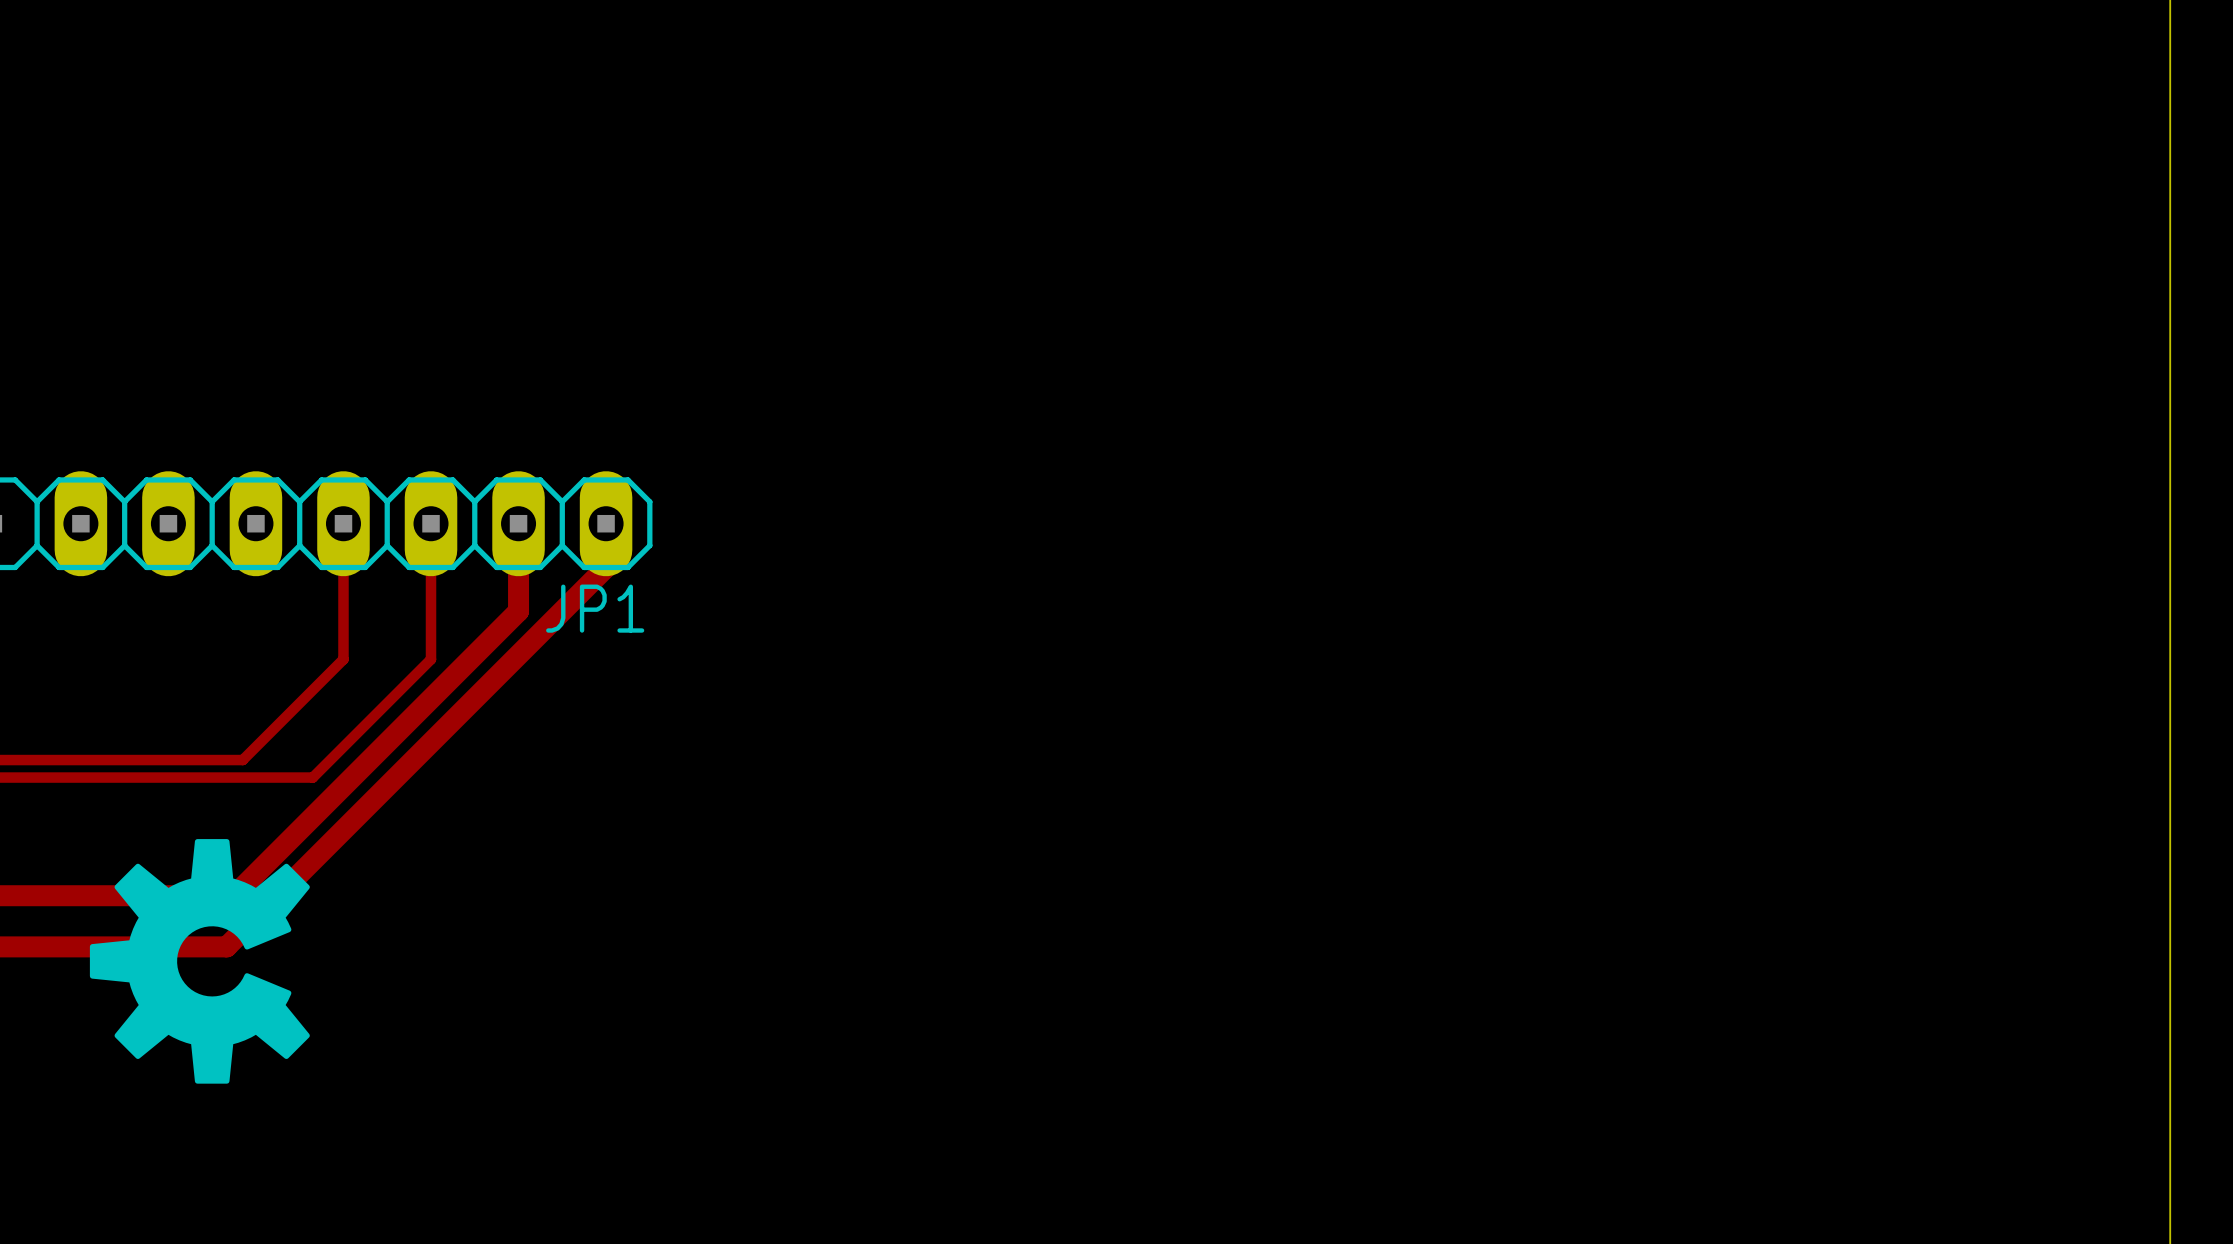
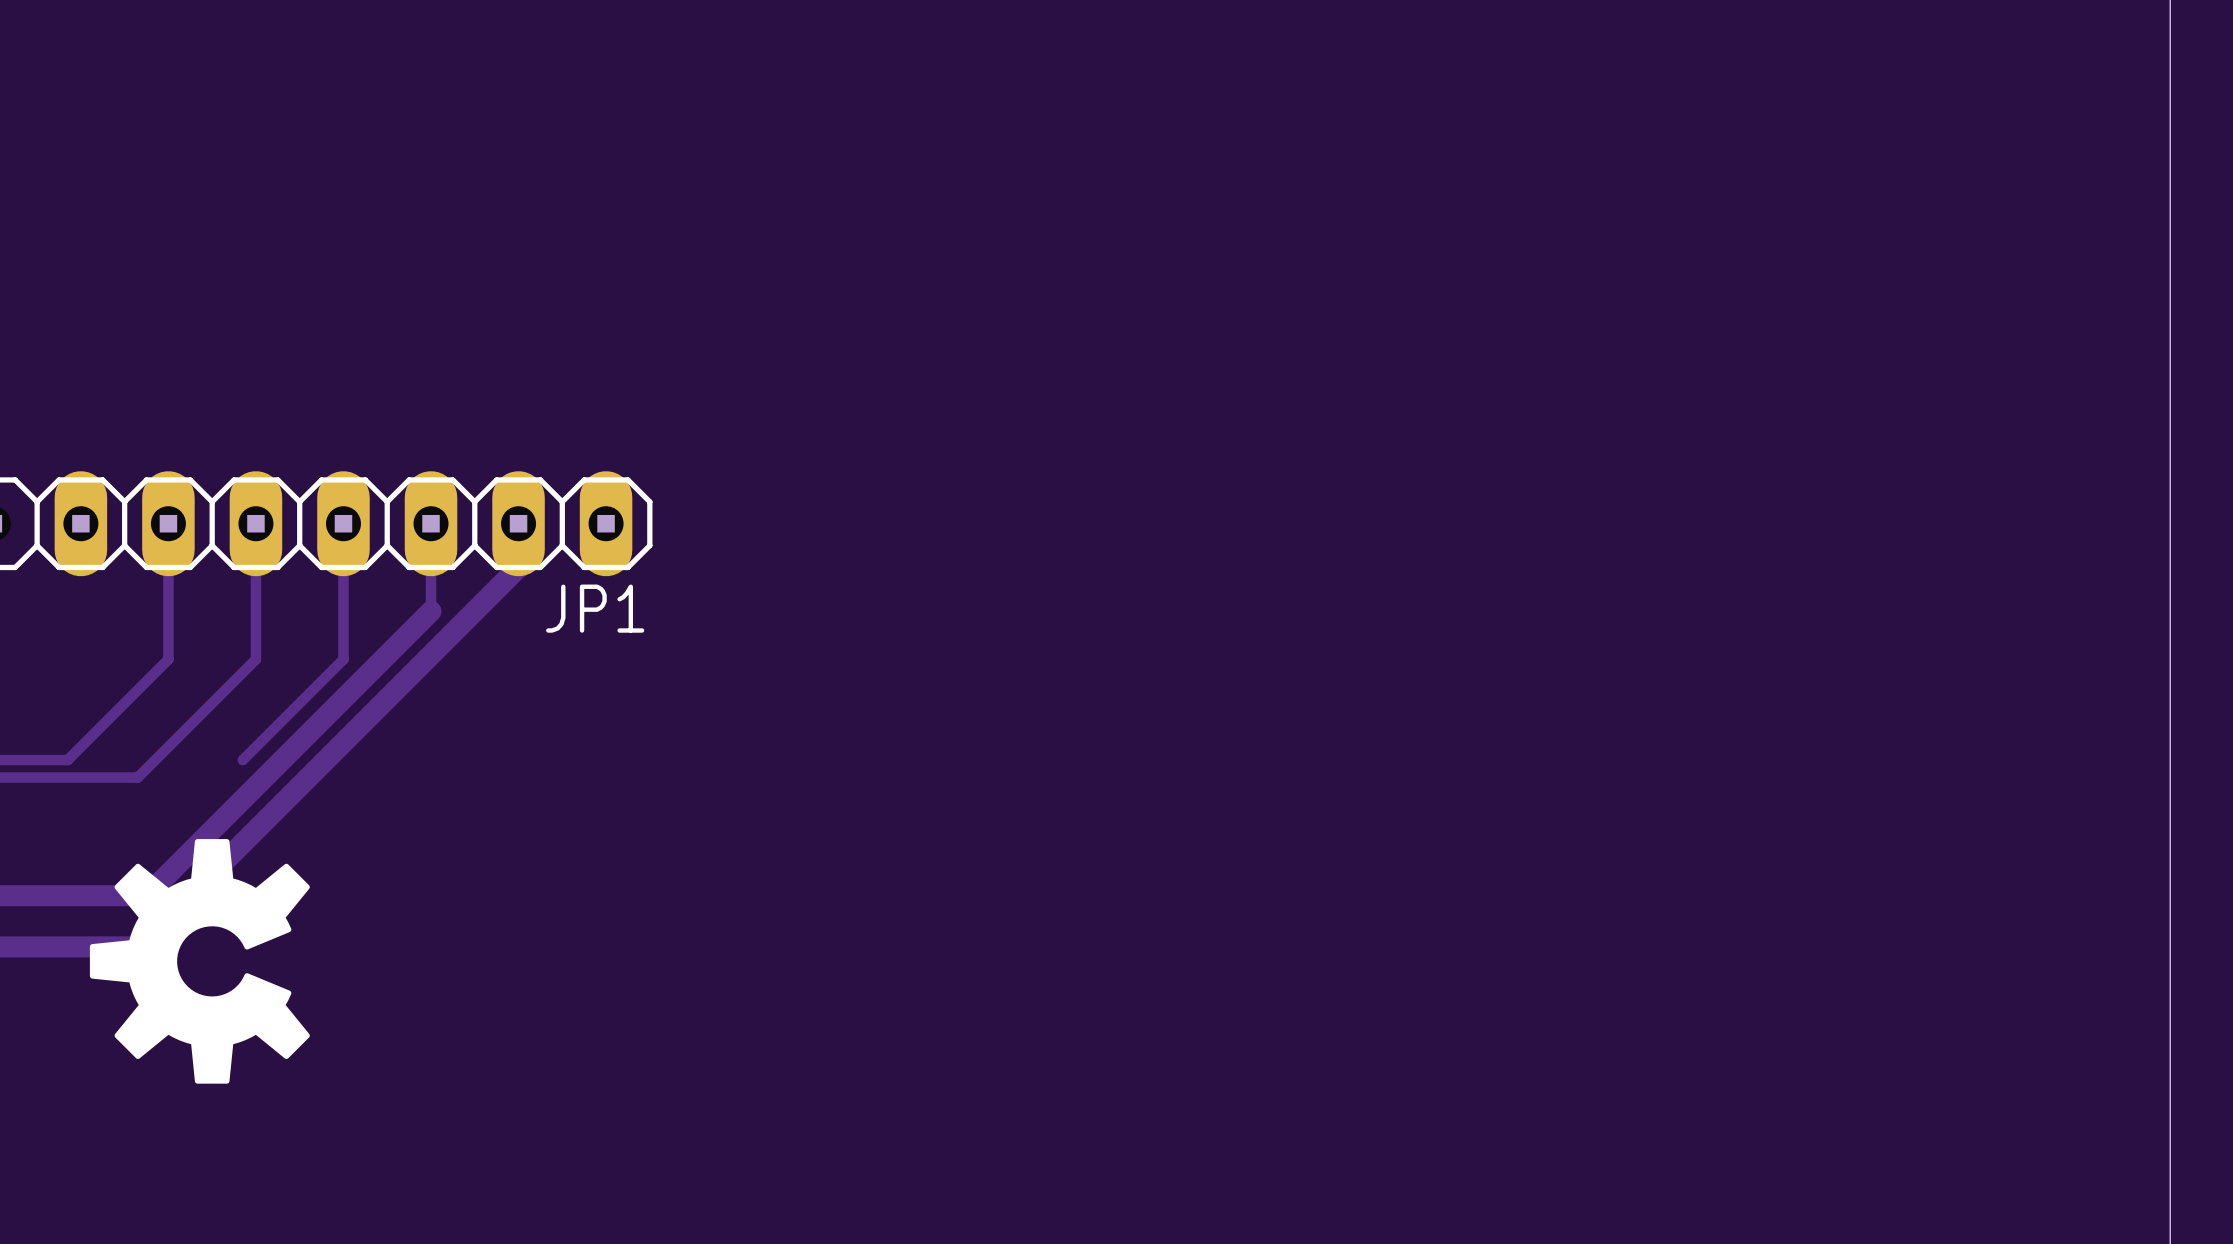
track: none -> (255, 523) (255, 659) (137, 777)
track: (606, 523) (606, 567) (226, 946) (139, 946) -> none
track: (518, 567) (518, 611) (234, 895) (146, 895) -> (518, 567) (139, 946)
track: (431, 611) (431, 659) (312, 777) (137, 777) -> (431, 611) (146, 895)
track: (67, 760) (242, 760) -> (67, 760) (168, 659) (168, 523)

